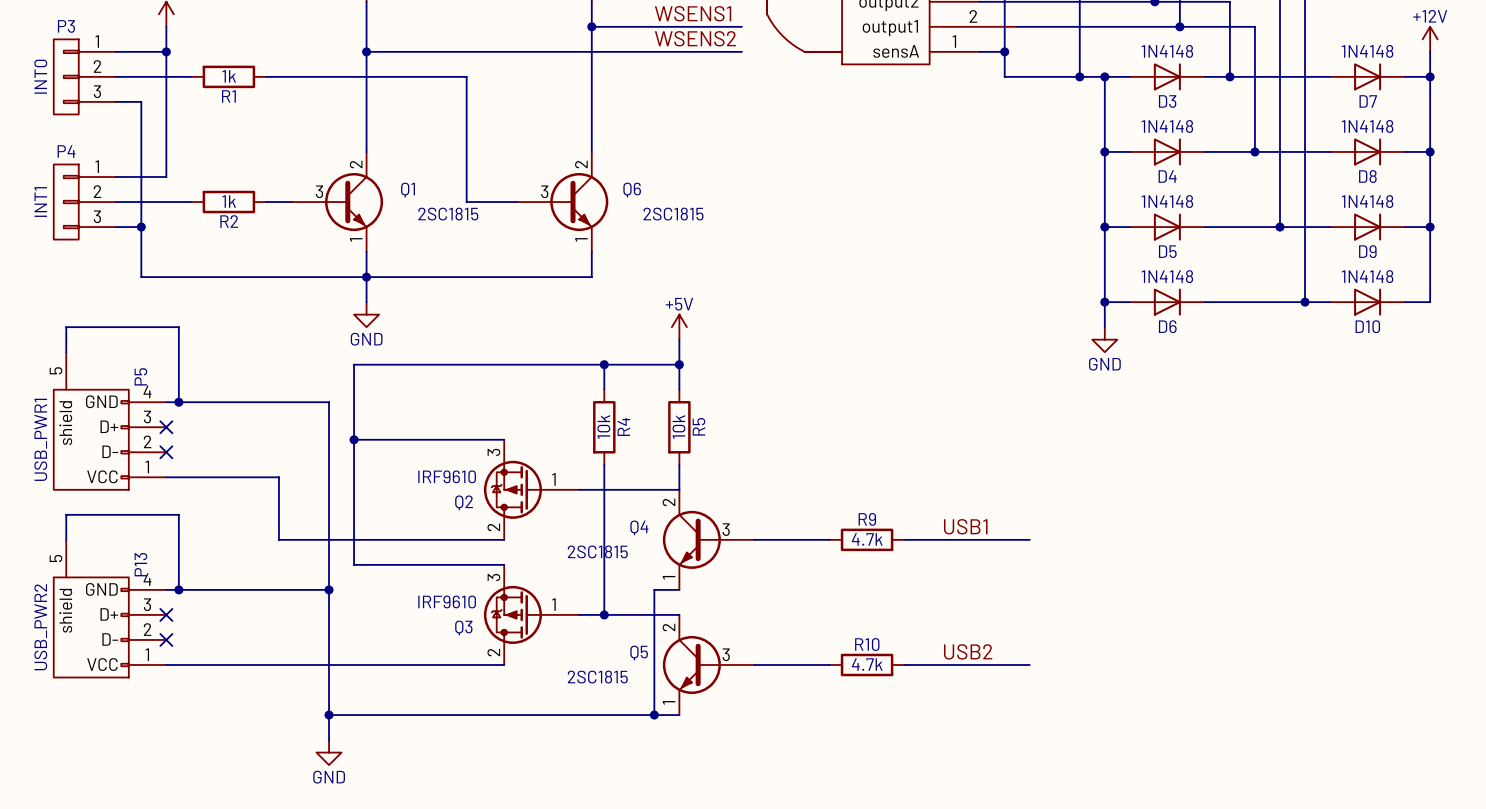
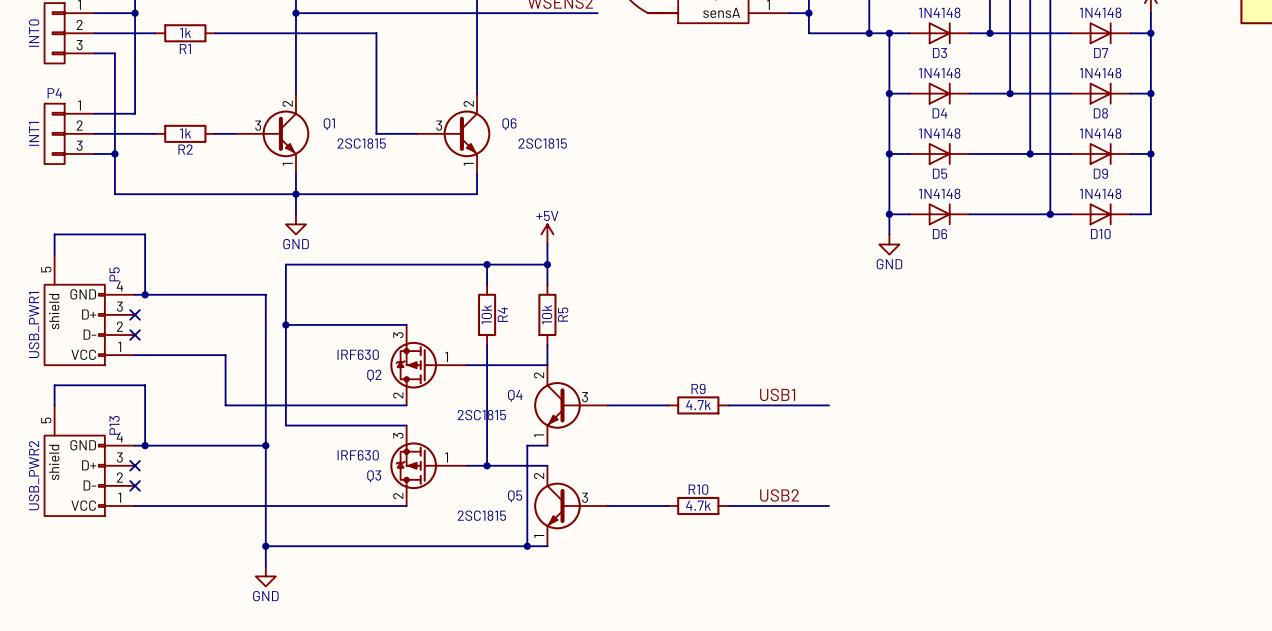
Q2 value: IRF9610 (447, 476) -> IRF630 (358, 354)
Q3 value: IRF9610 (447, 601) -> IRF630 (358, 455)

